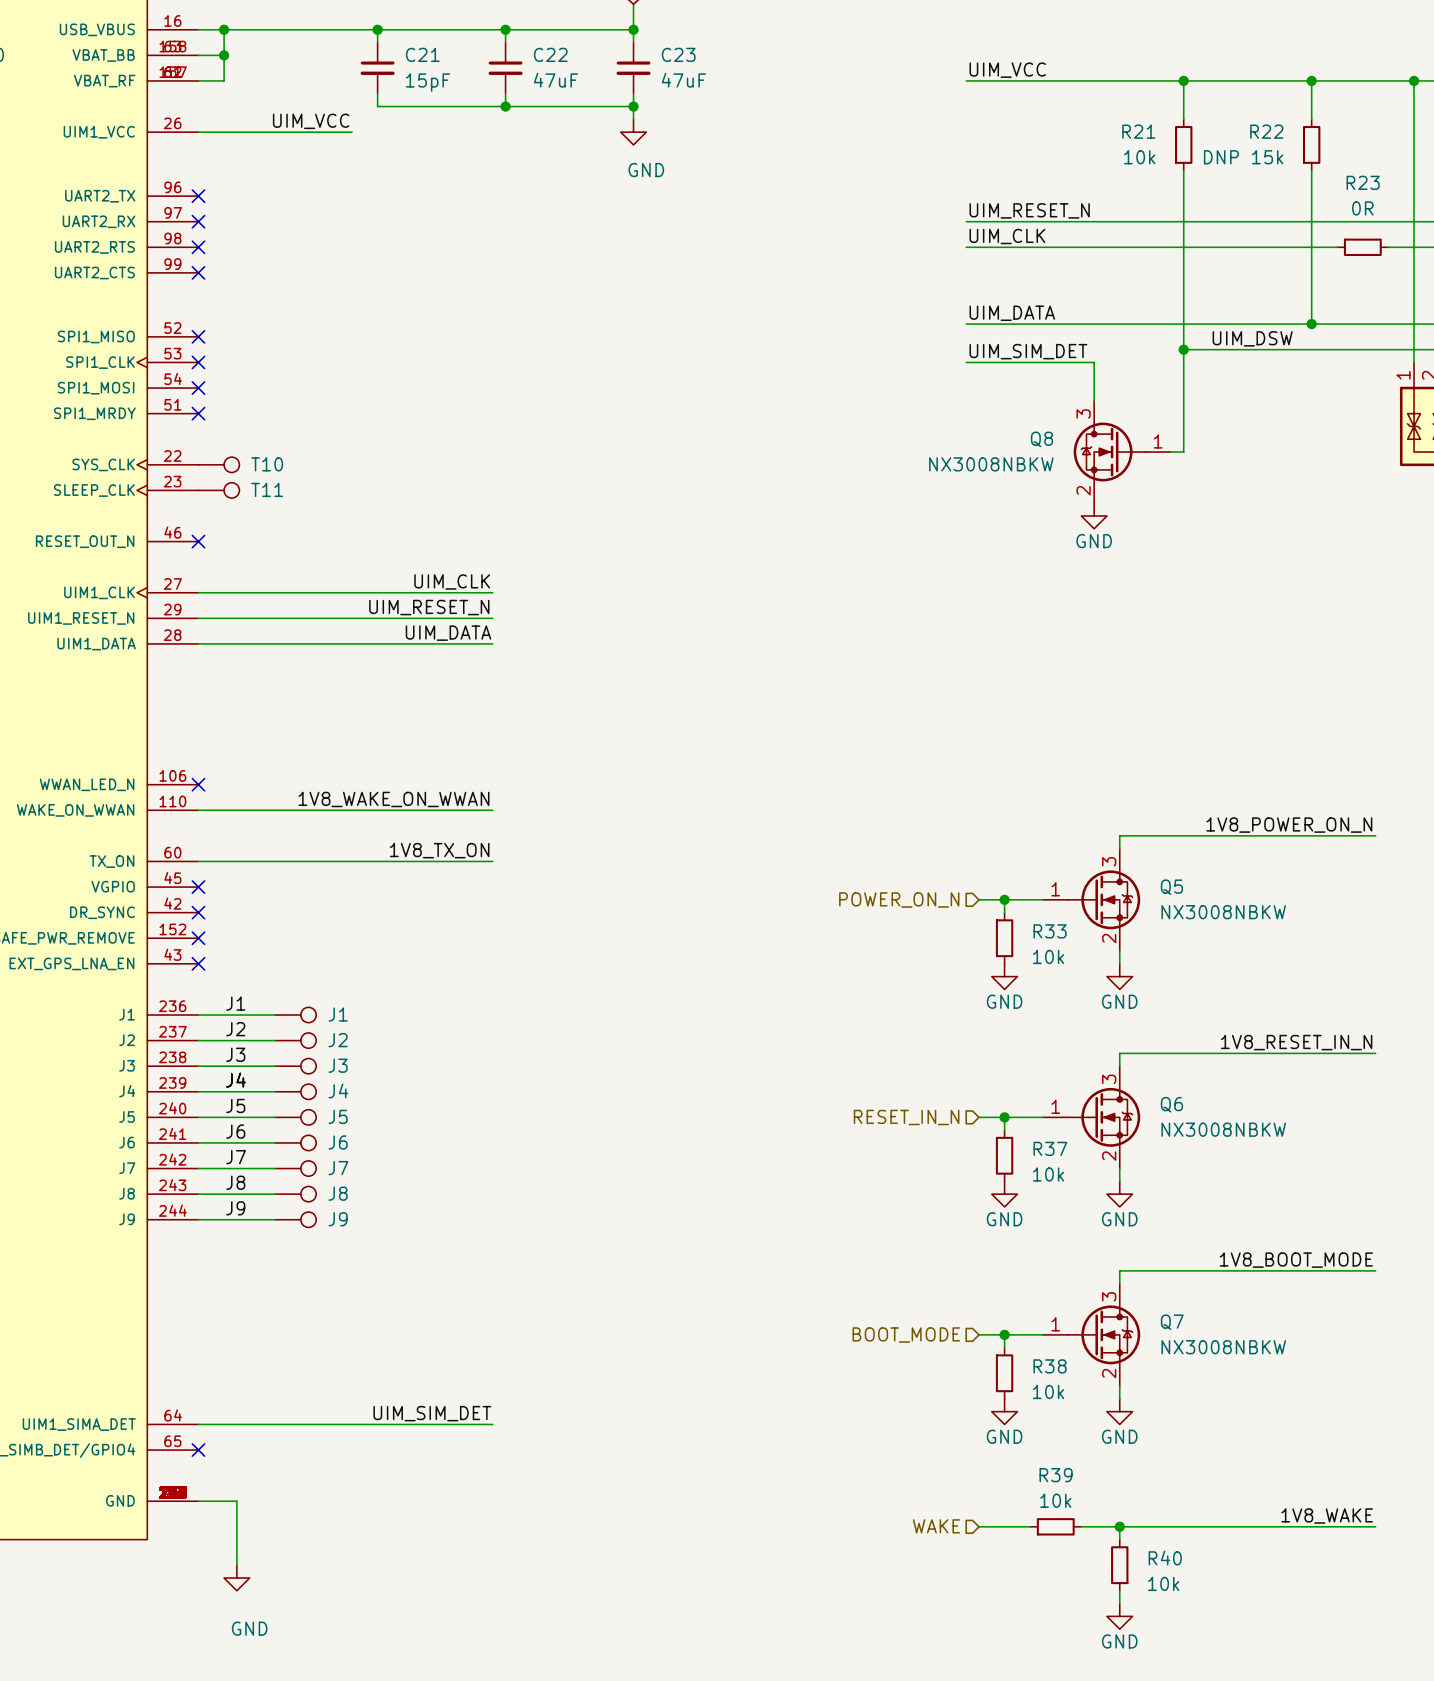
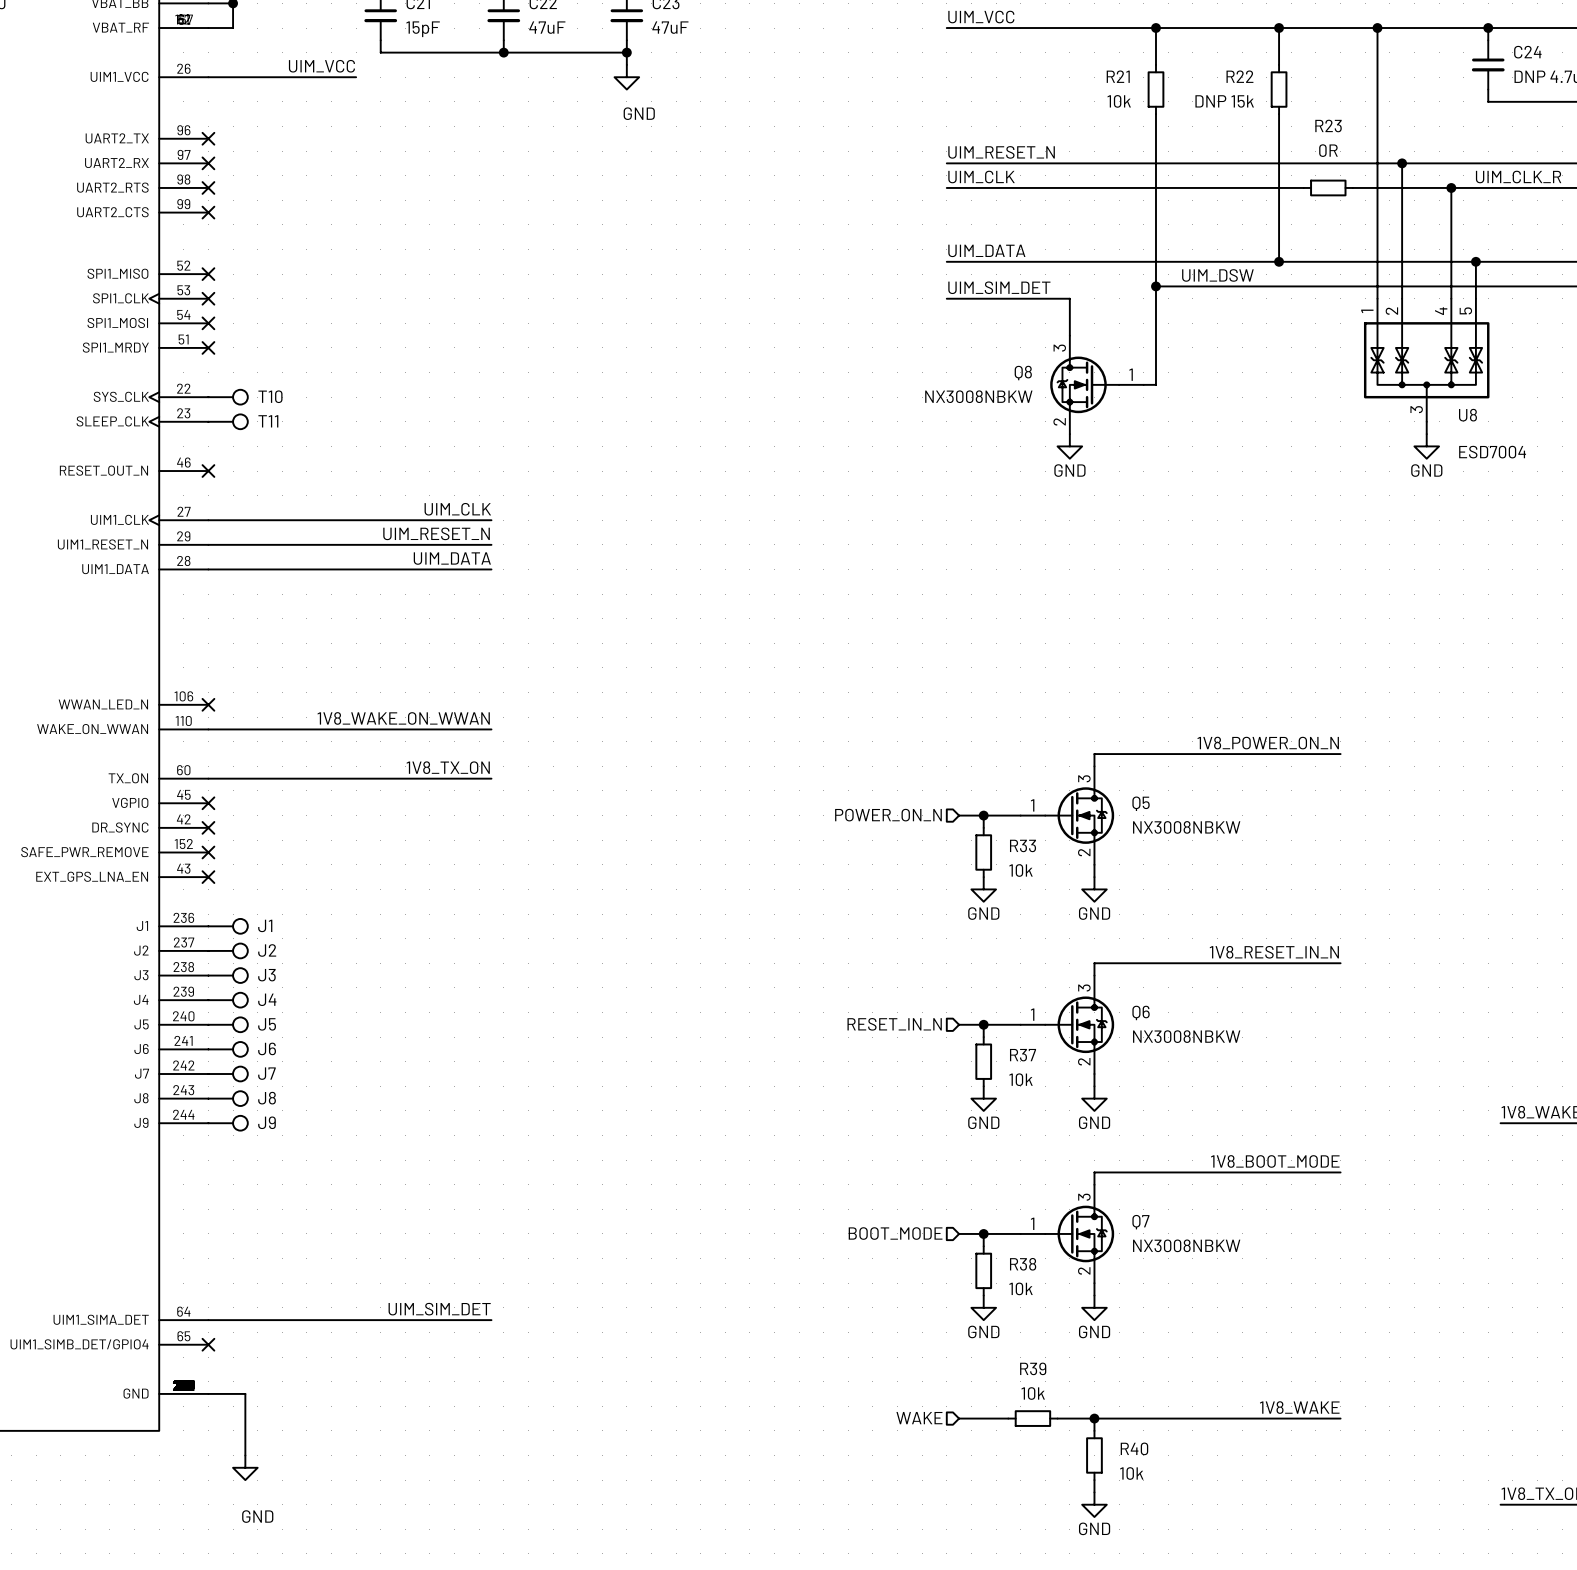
label: J1 (235, 1003) -> none
wire: (198, 1015) (275, 1015) -> none
J1 position: (295, 1015) -> (228, 926)
label: J2 (235, 1029) -> none
wire: (198, 1040) (275, 1040) -> none
J2 position: (295, 1040) -> (228, 950)
label: J3 (235, 1054) -> none
wire: (198, 1066) (275, 1066) -> none
J3 position: (295, 1066) -> (228, 975)
label: J4 (236, 1080) -> none
wire: (198, 1091) (275, 1091) -> none
J4 position: (295, 1091) -> (228, 1000)
label: J5 (235, 1105) -> none
wire: (198, 1117) (275, 1117) -> none
J5 position: (295, 1117) -> (228, 1024)
label: J6 (235, 1131) -> none
wire: (198, 1142) (275, 1142) -> none
J6 position: (295, 1142) -> (228, 1049)
label: J7 (236, 1157) -> none
wire: (198, 1168) (275, 1168) -> none
J7 position: (295, 1168) -> (228, 1074)
label: J8 (235, 1182) -> none
wire: (198, 1194) (275, 1194) -> none
J8 position: (295, 1194) -> (228, 1098)
label: J9 (235, 1208) -> none
wire: (198, 1219) (275, 1219) -> none
J9 position: (295, 1219) -> (228, 1123)

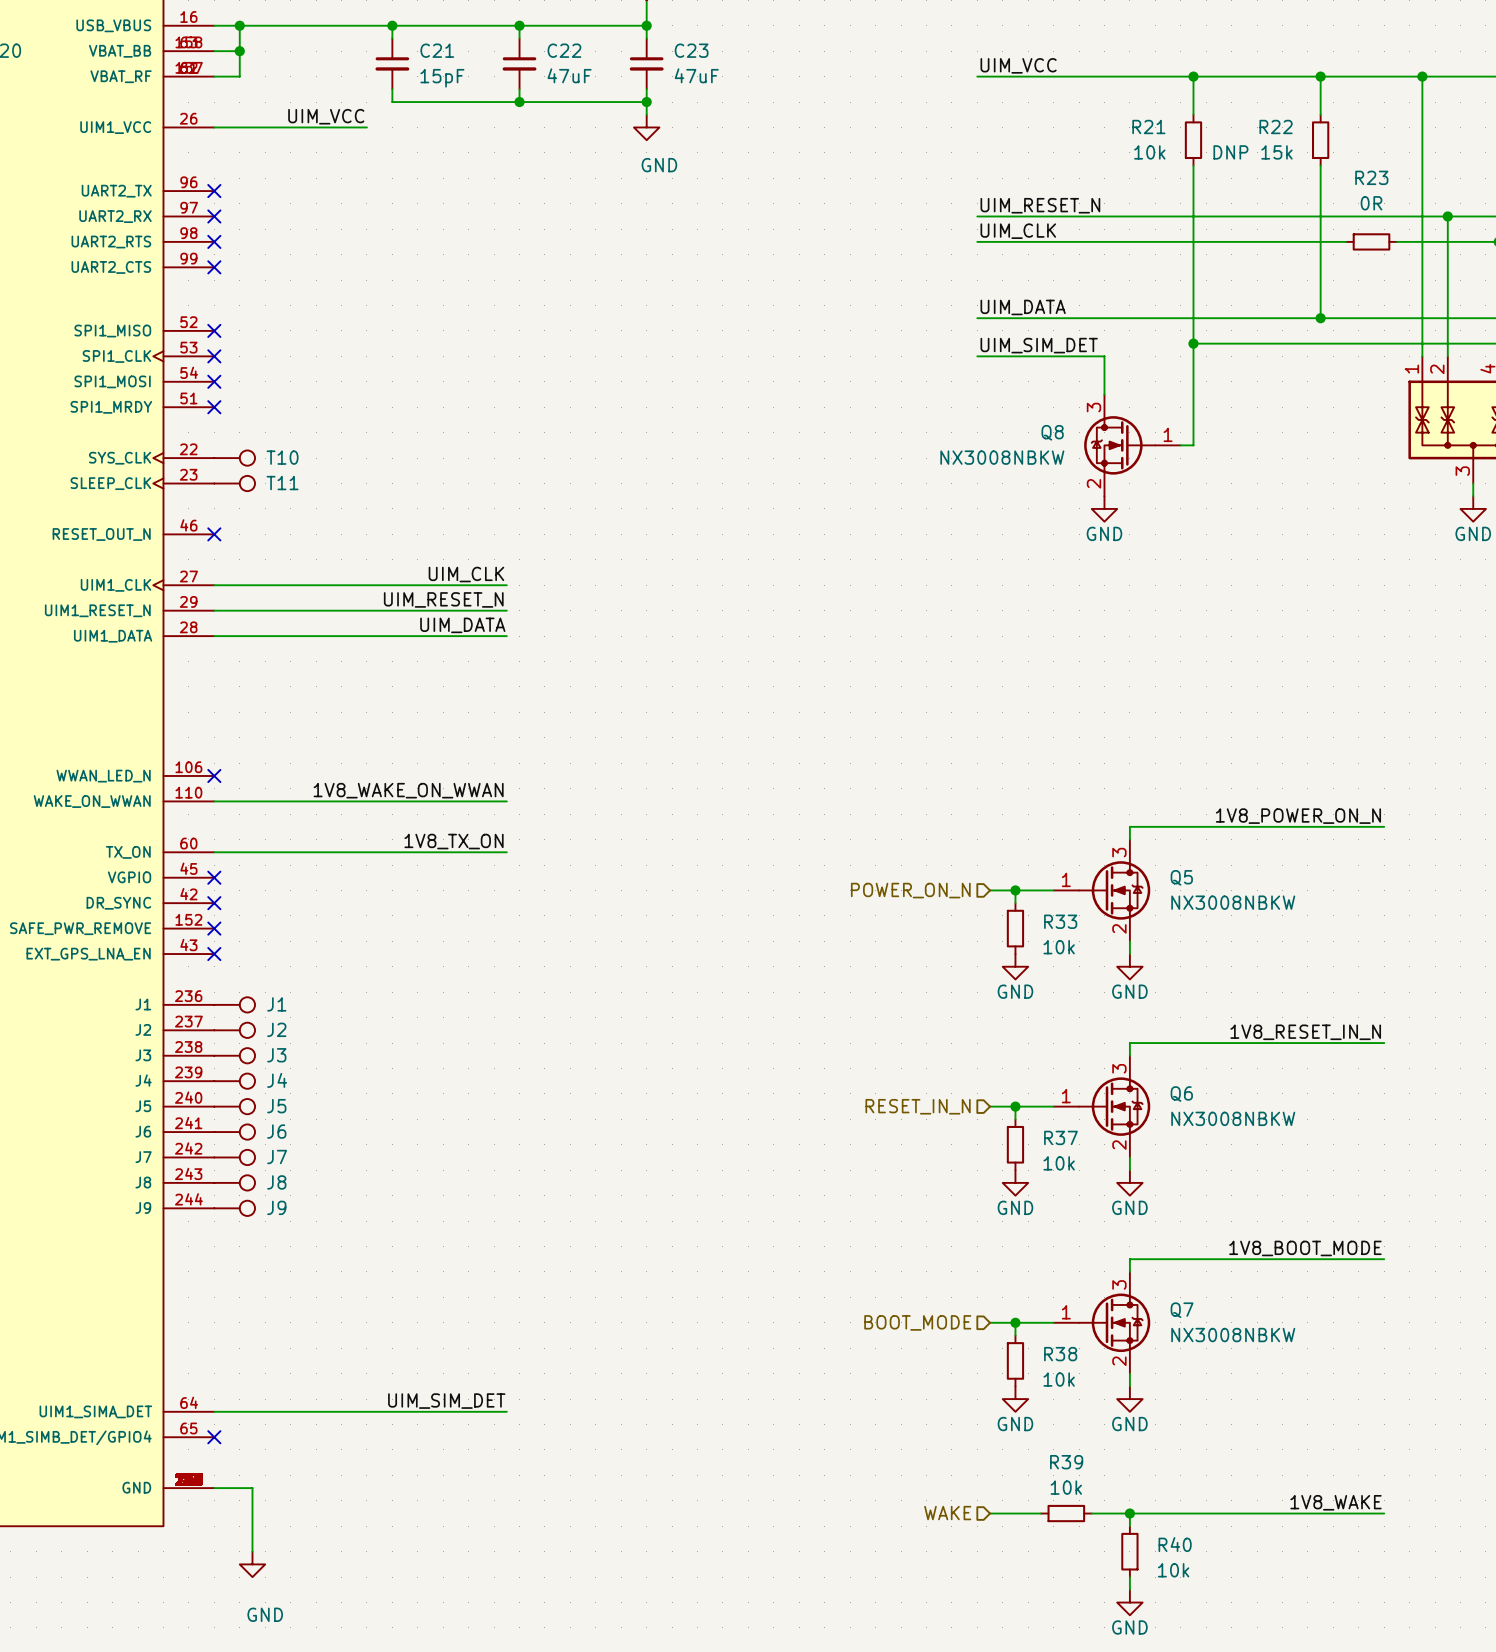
label: UIM_DSW (1217, 275) -> none

